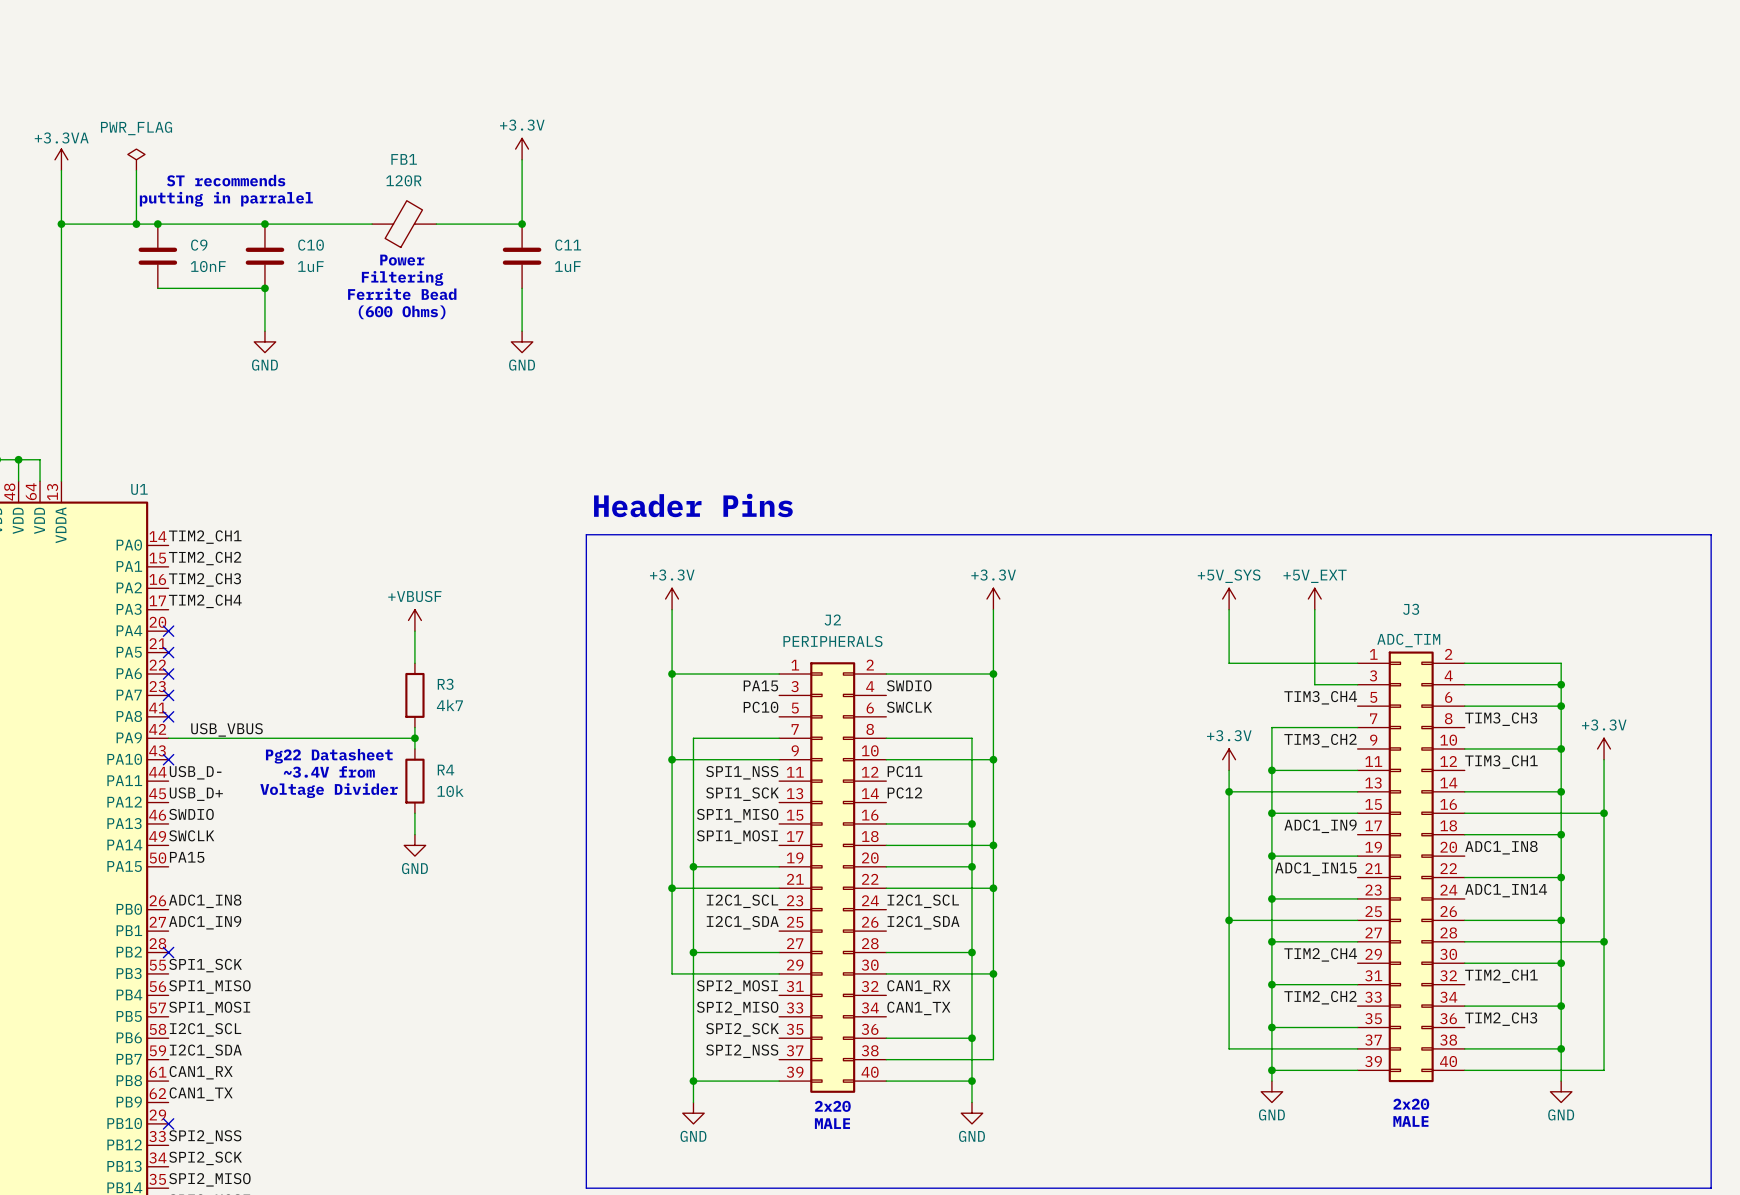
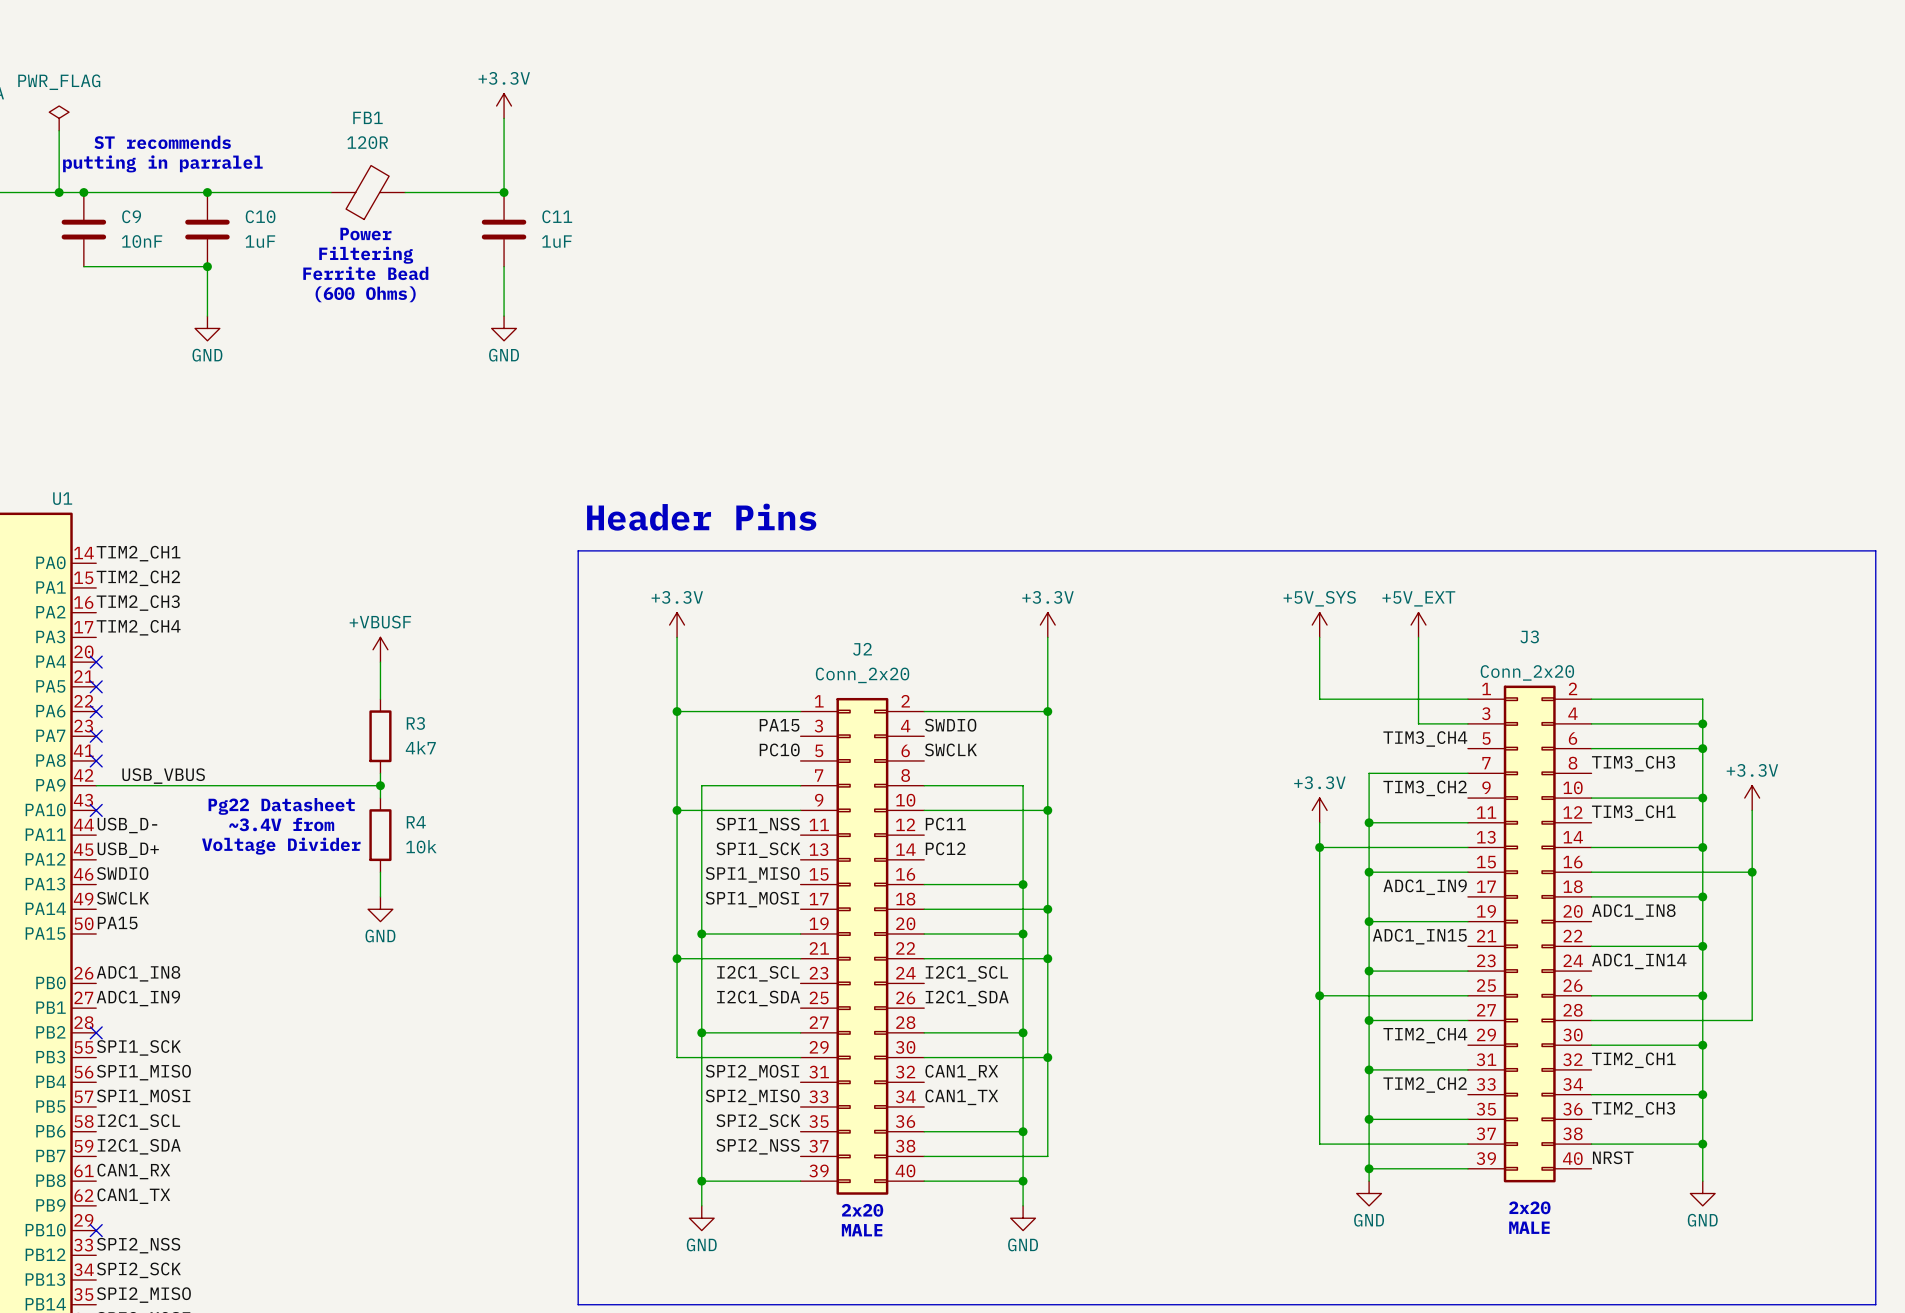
J3 value: ADC_TIM (1408, 640) -> Conn_2x20 (1527, 672)
J2 value: PERIPHERALS (832, 641) -> Conn_2x20 (862, 675)
wire: (1604, 941) (1604, 1070) (1464, 1070) -> none
junction: (1604, 941) -> none
label: none -> NRST (1613, 1157)

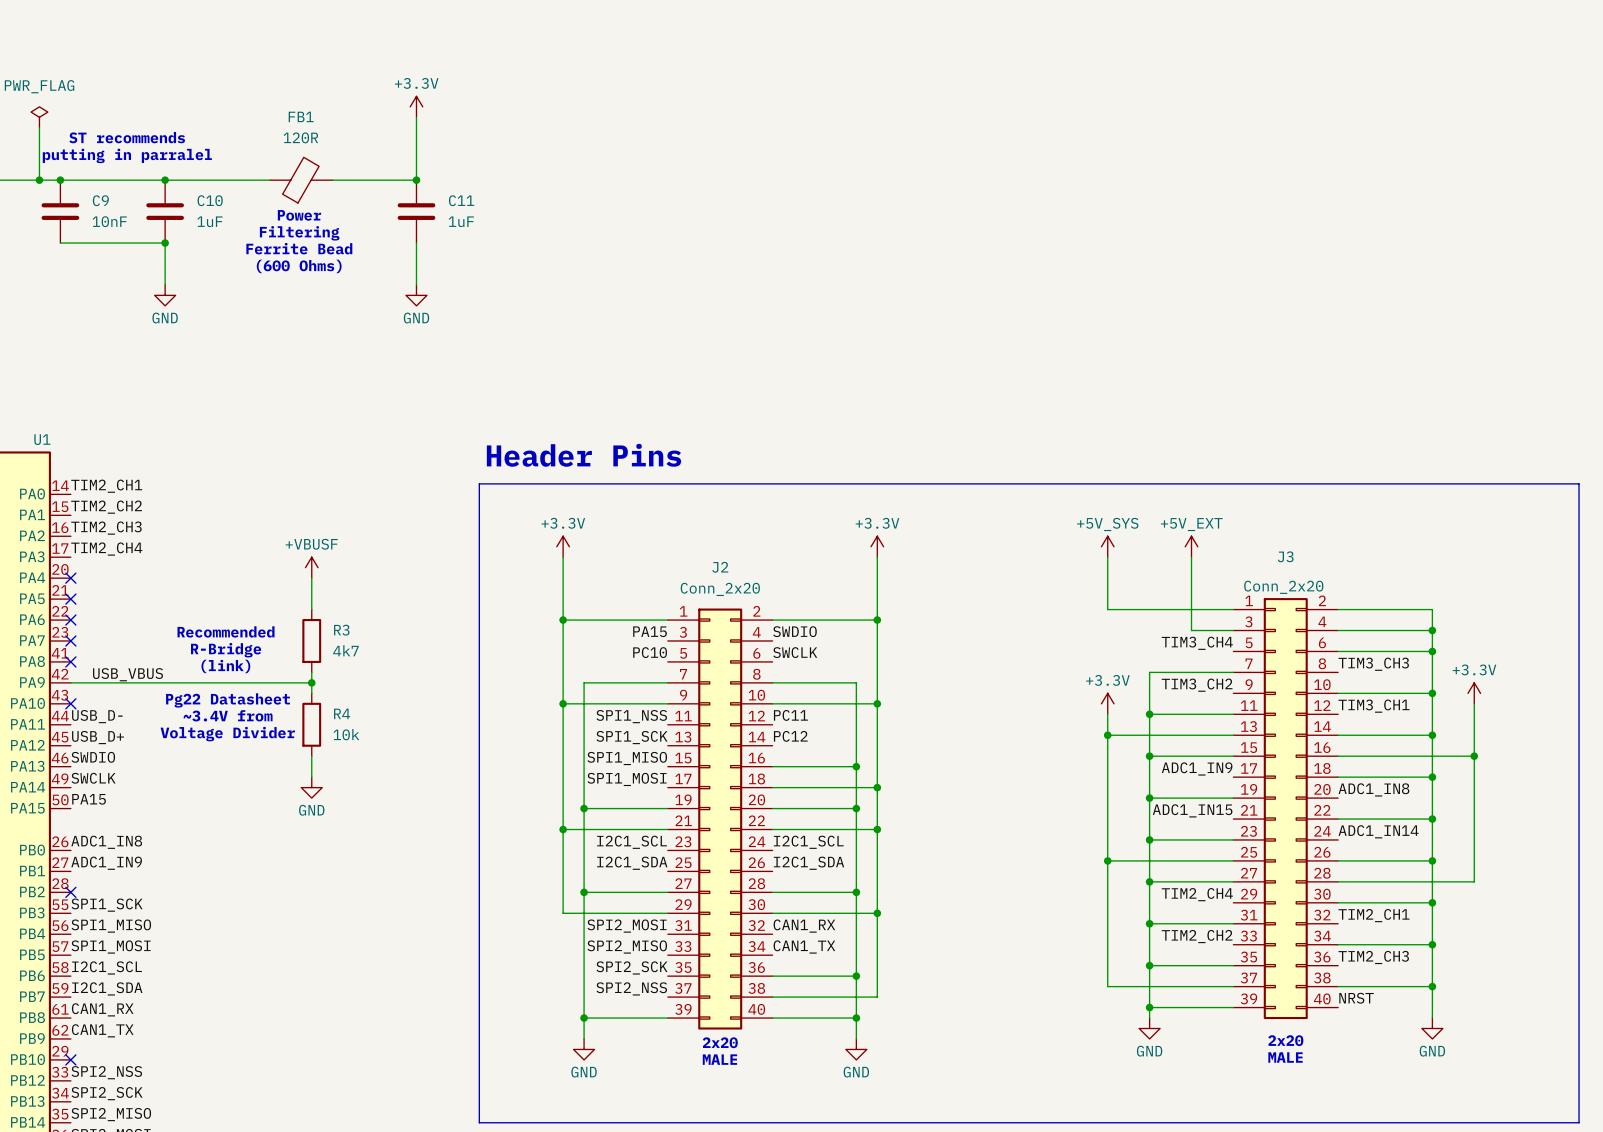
text: none -> Recommended (226, 631)
text: none -> R-Bridge (226, 650)
text: none -> (link) (225, 666)

